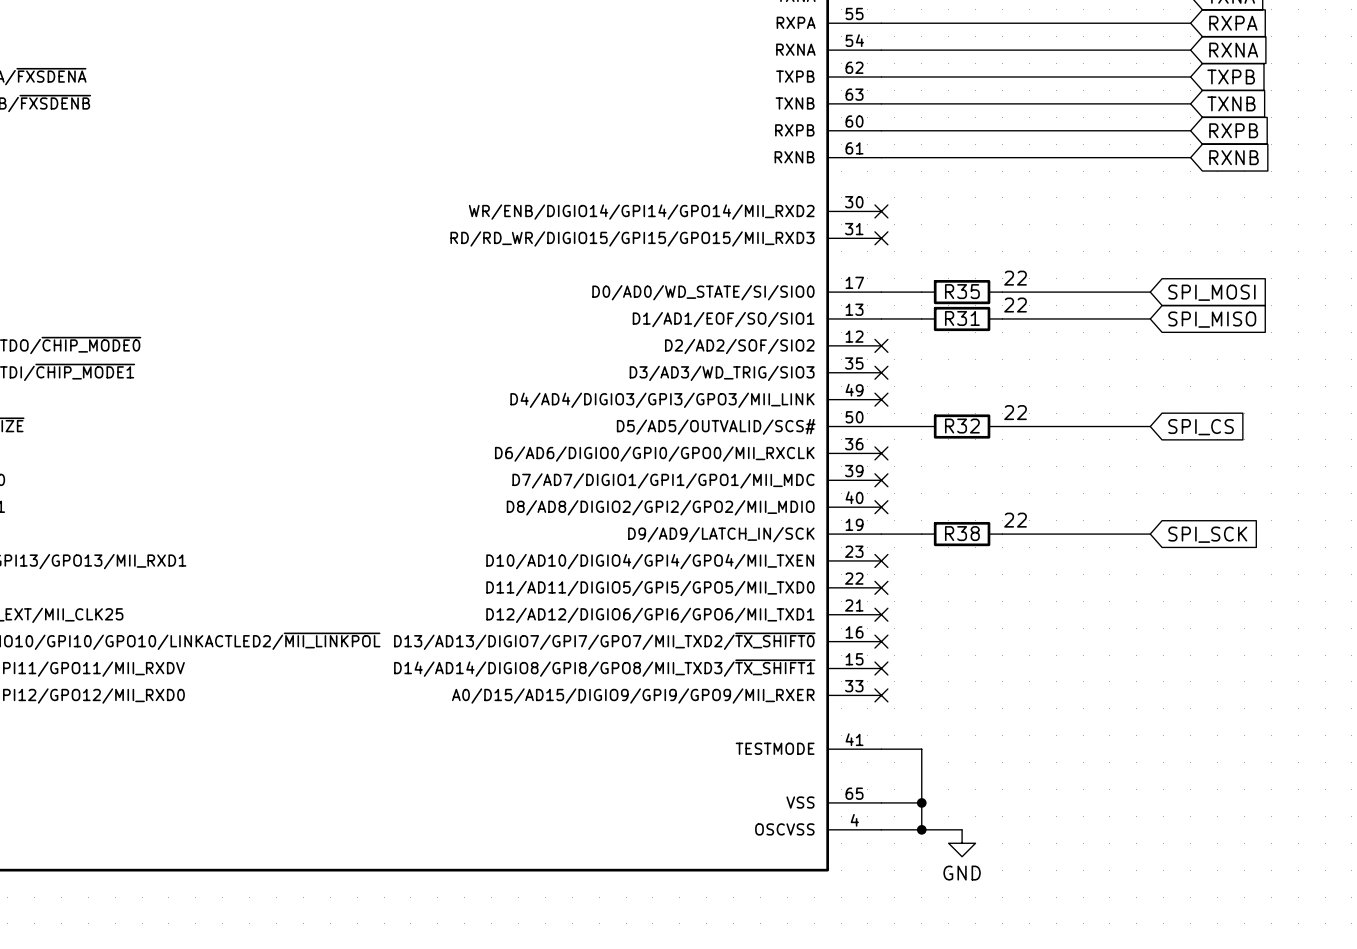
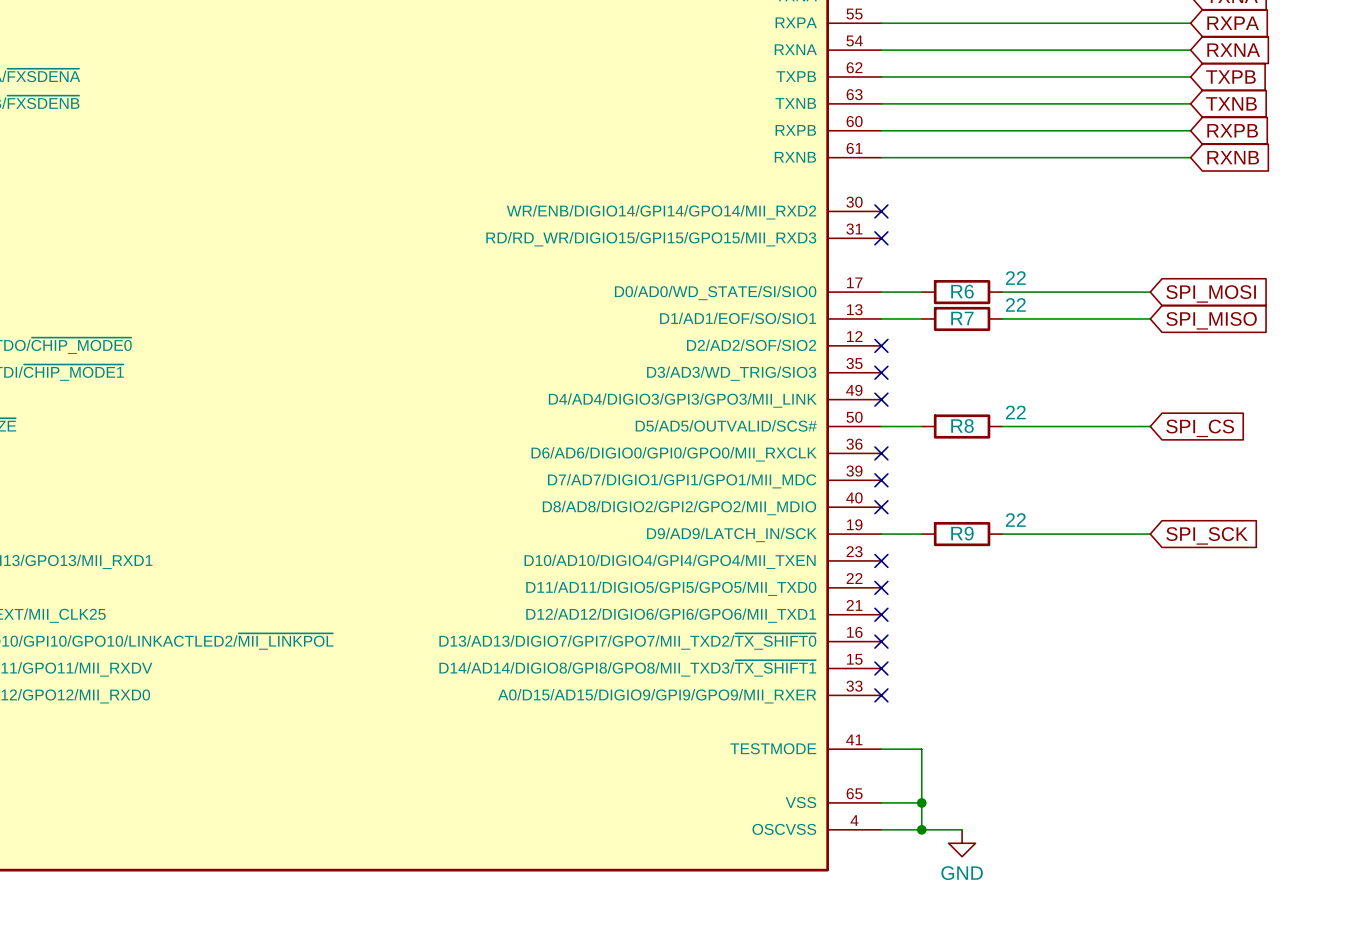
R35 name: R35 (962, 291) -> R6 (962, 291)
R31 name: R31 (962, 318) -> R7 (962, 318)
R32 name: R32 (962, 426) -> R8 (962, 426)
R38 name: R38 (962, 533) -> R9 (962, 533)

